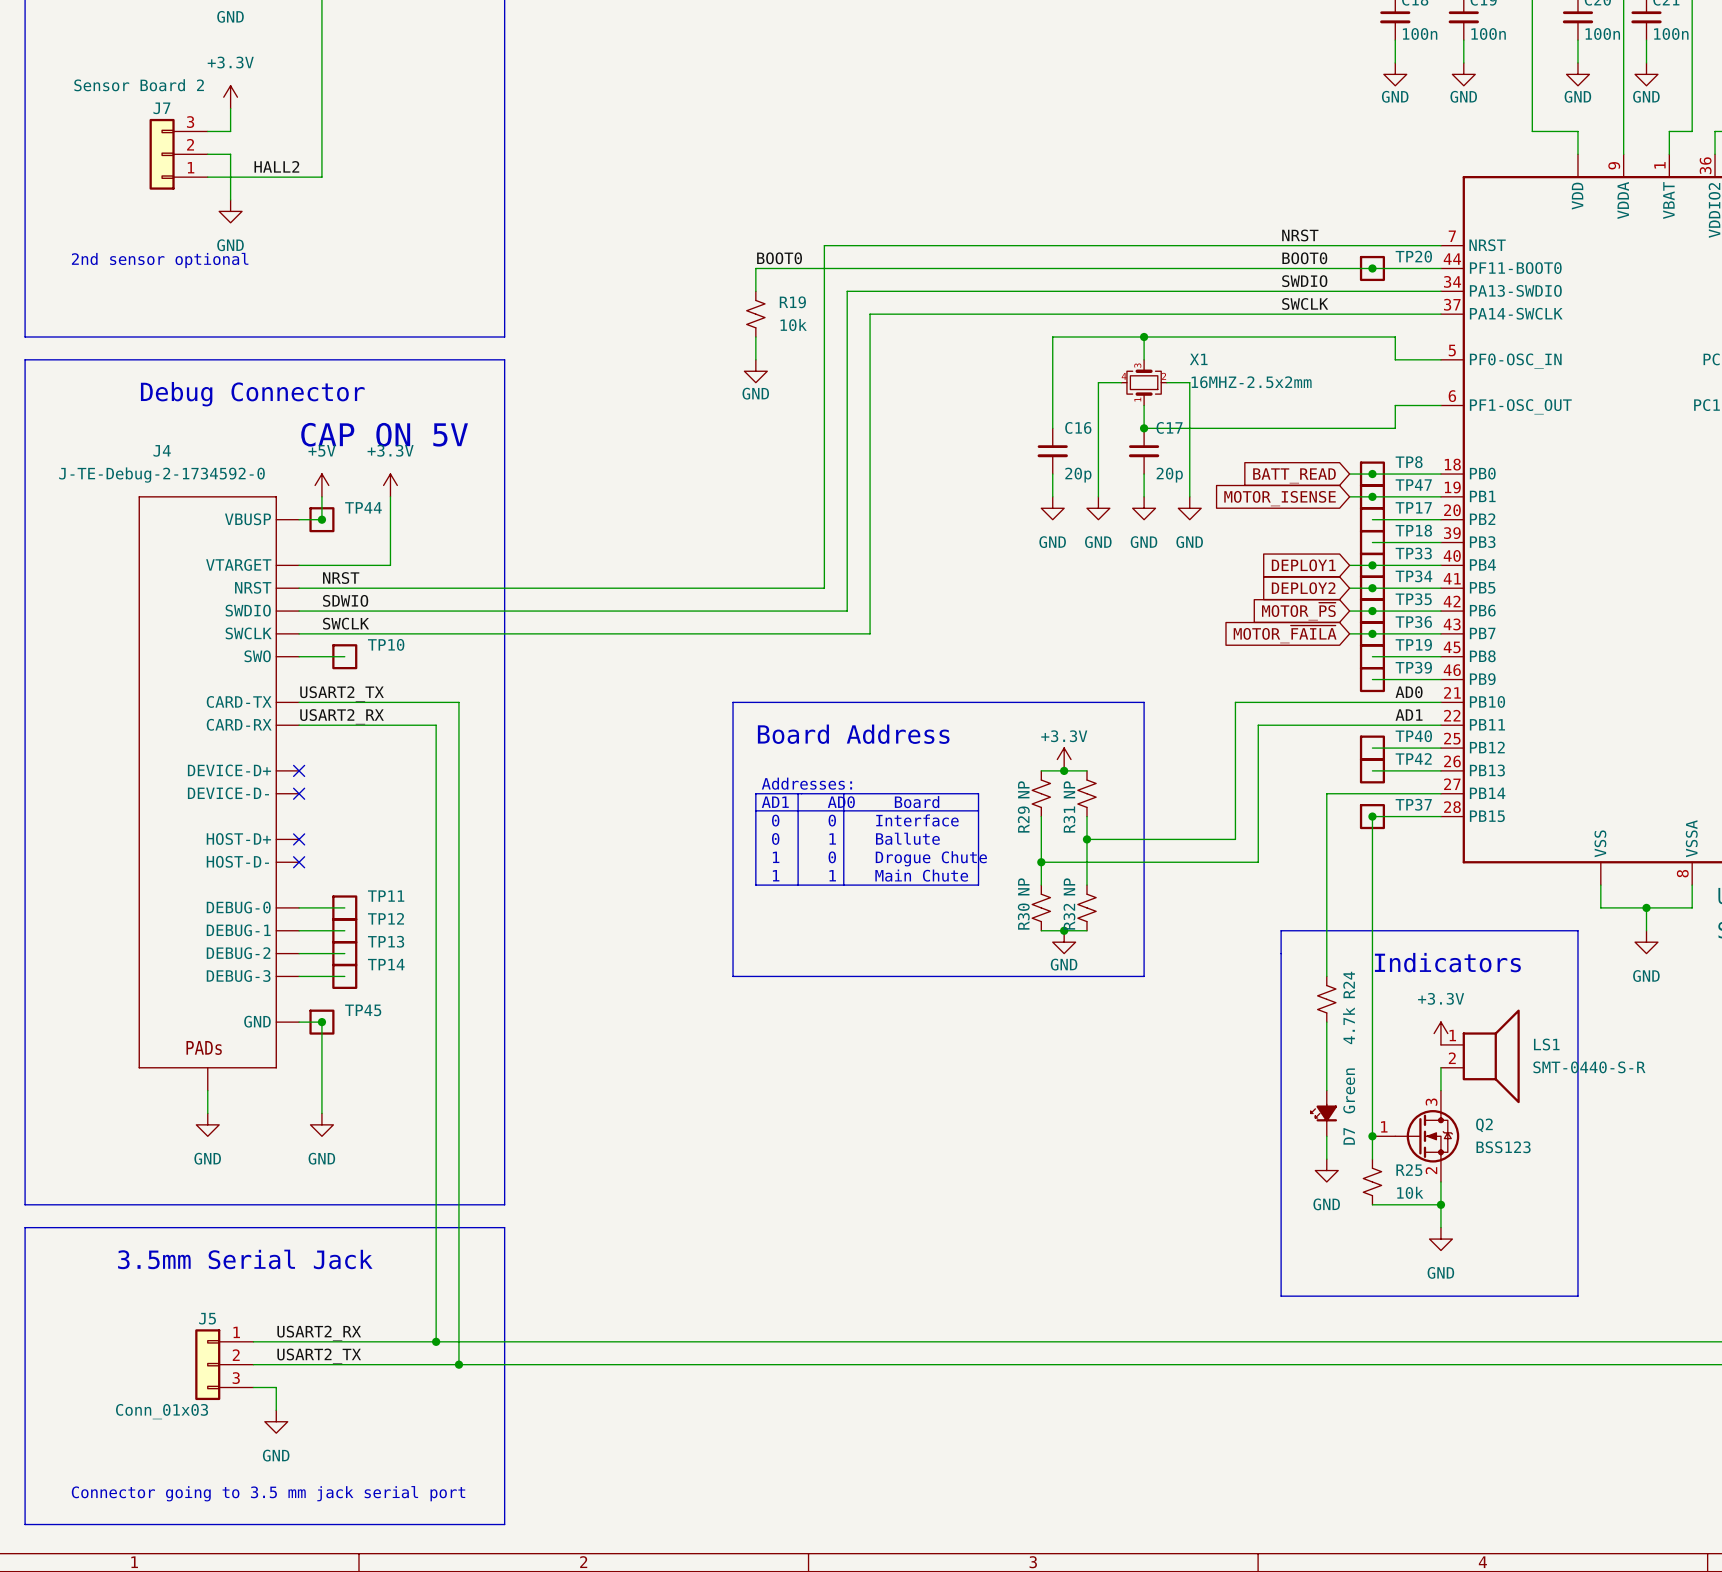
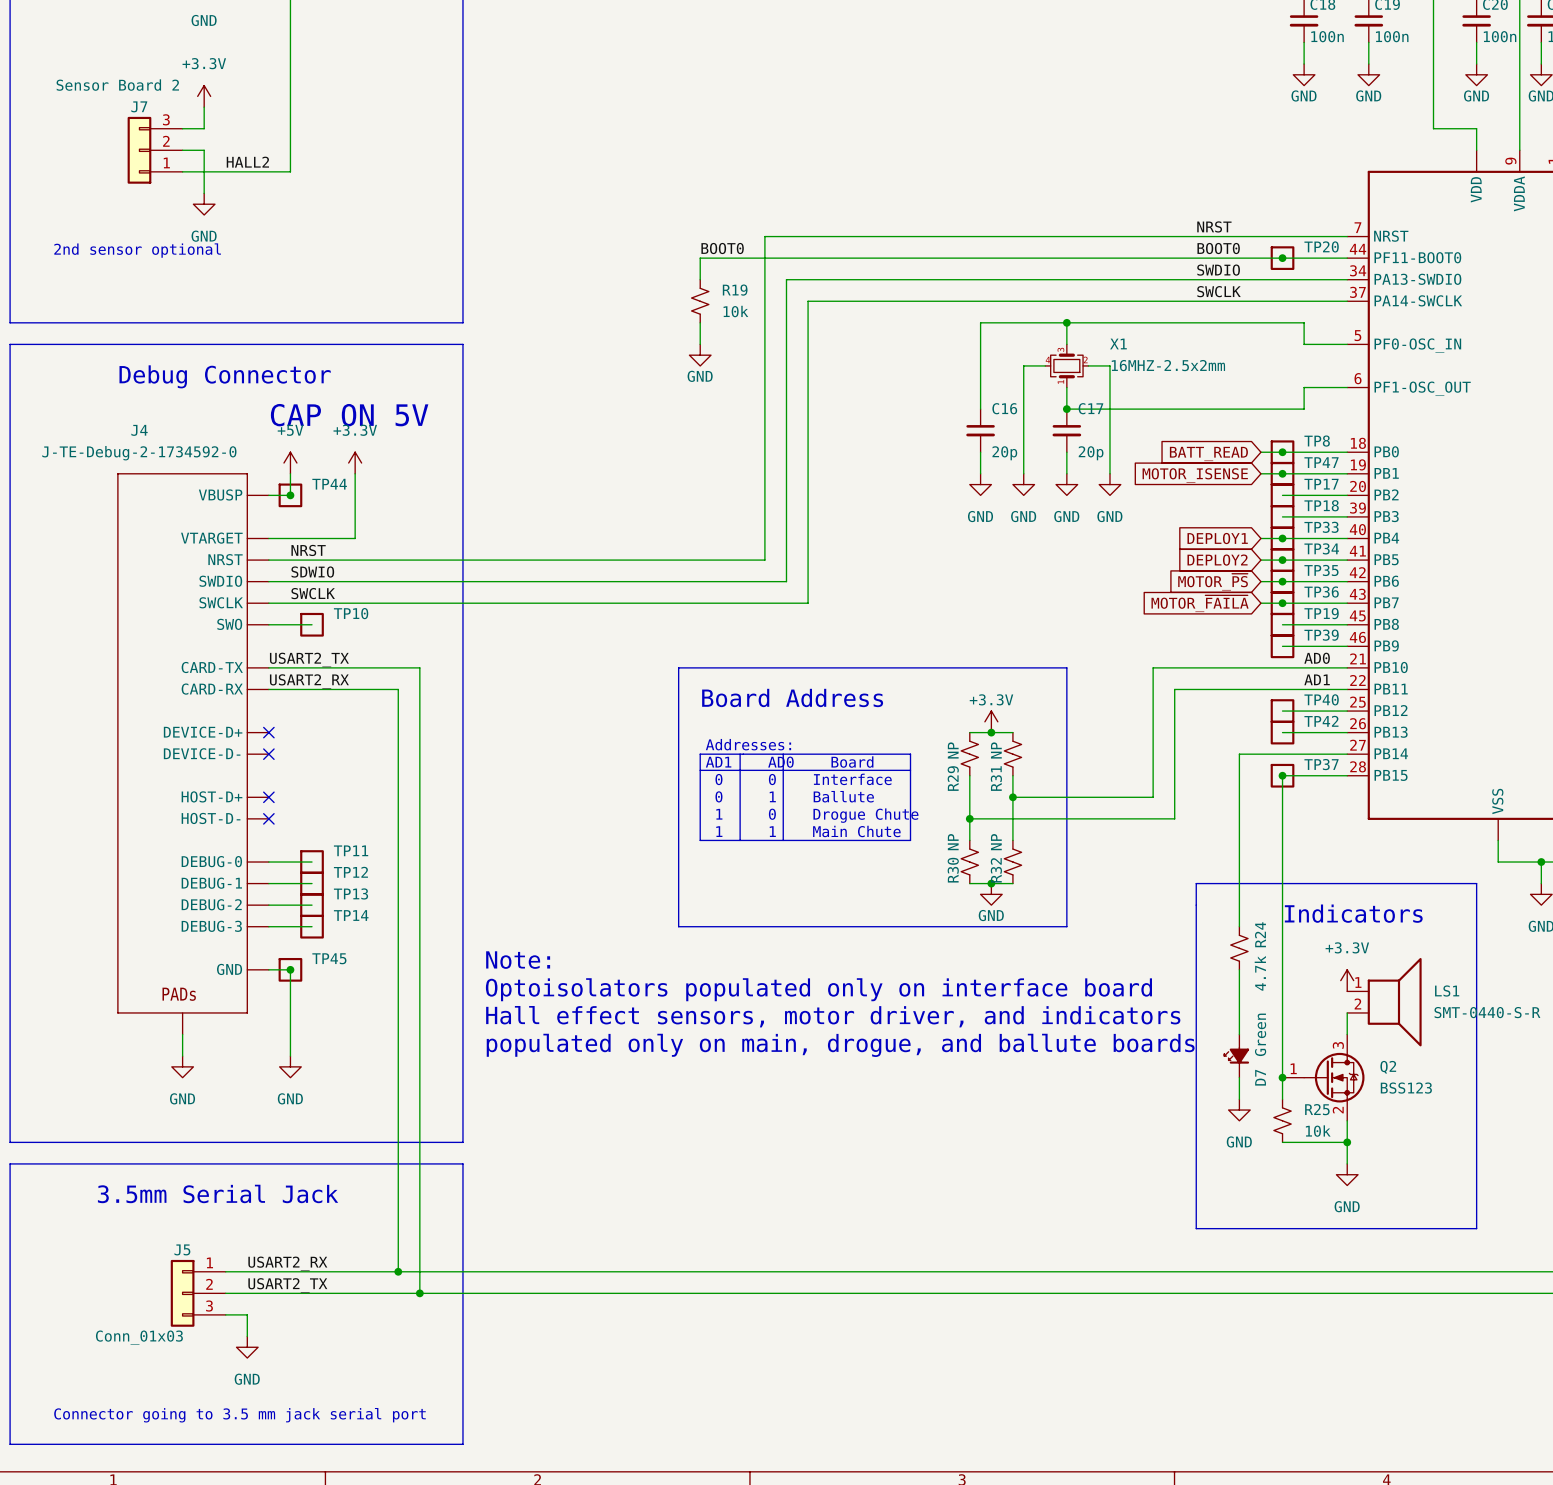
text: none -> Note: (518, 960)
text: none -> Optoisolators populated only on interface board (818, 989)
text: none -> Hall effect sensors, motor driver, and indicators (833, 1016)
text: none -> populated only on main, drogue, and ballute boards (840, 1045)

